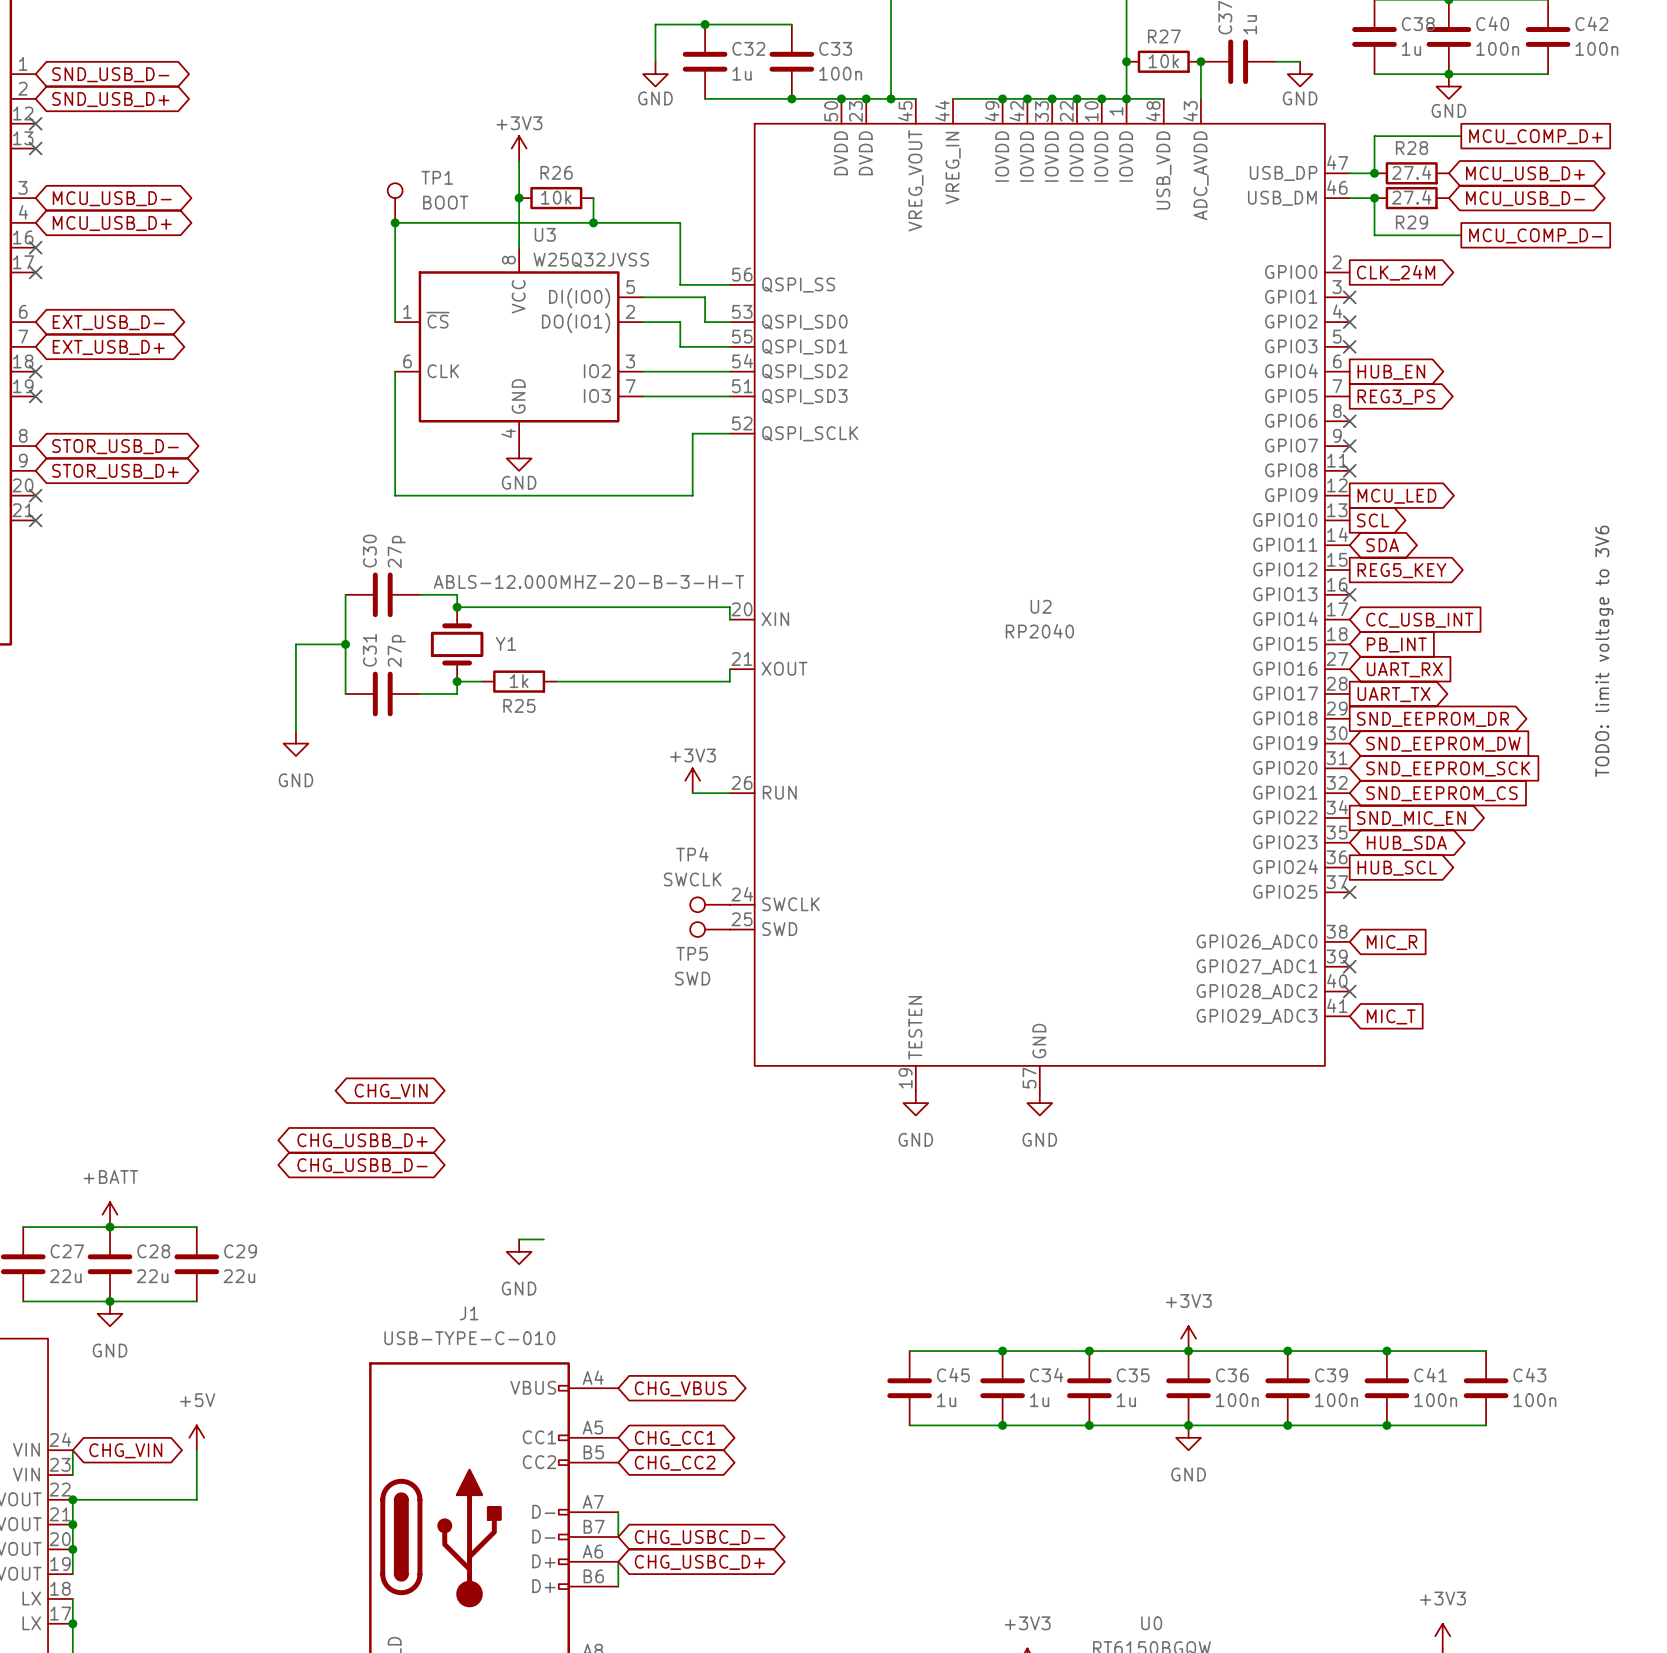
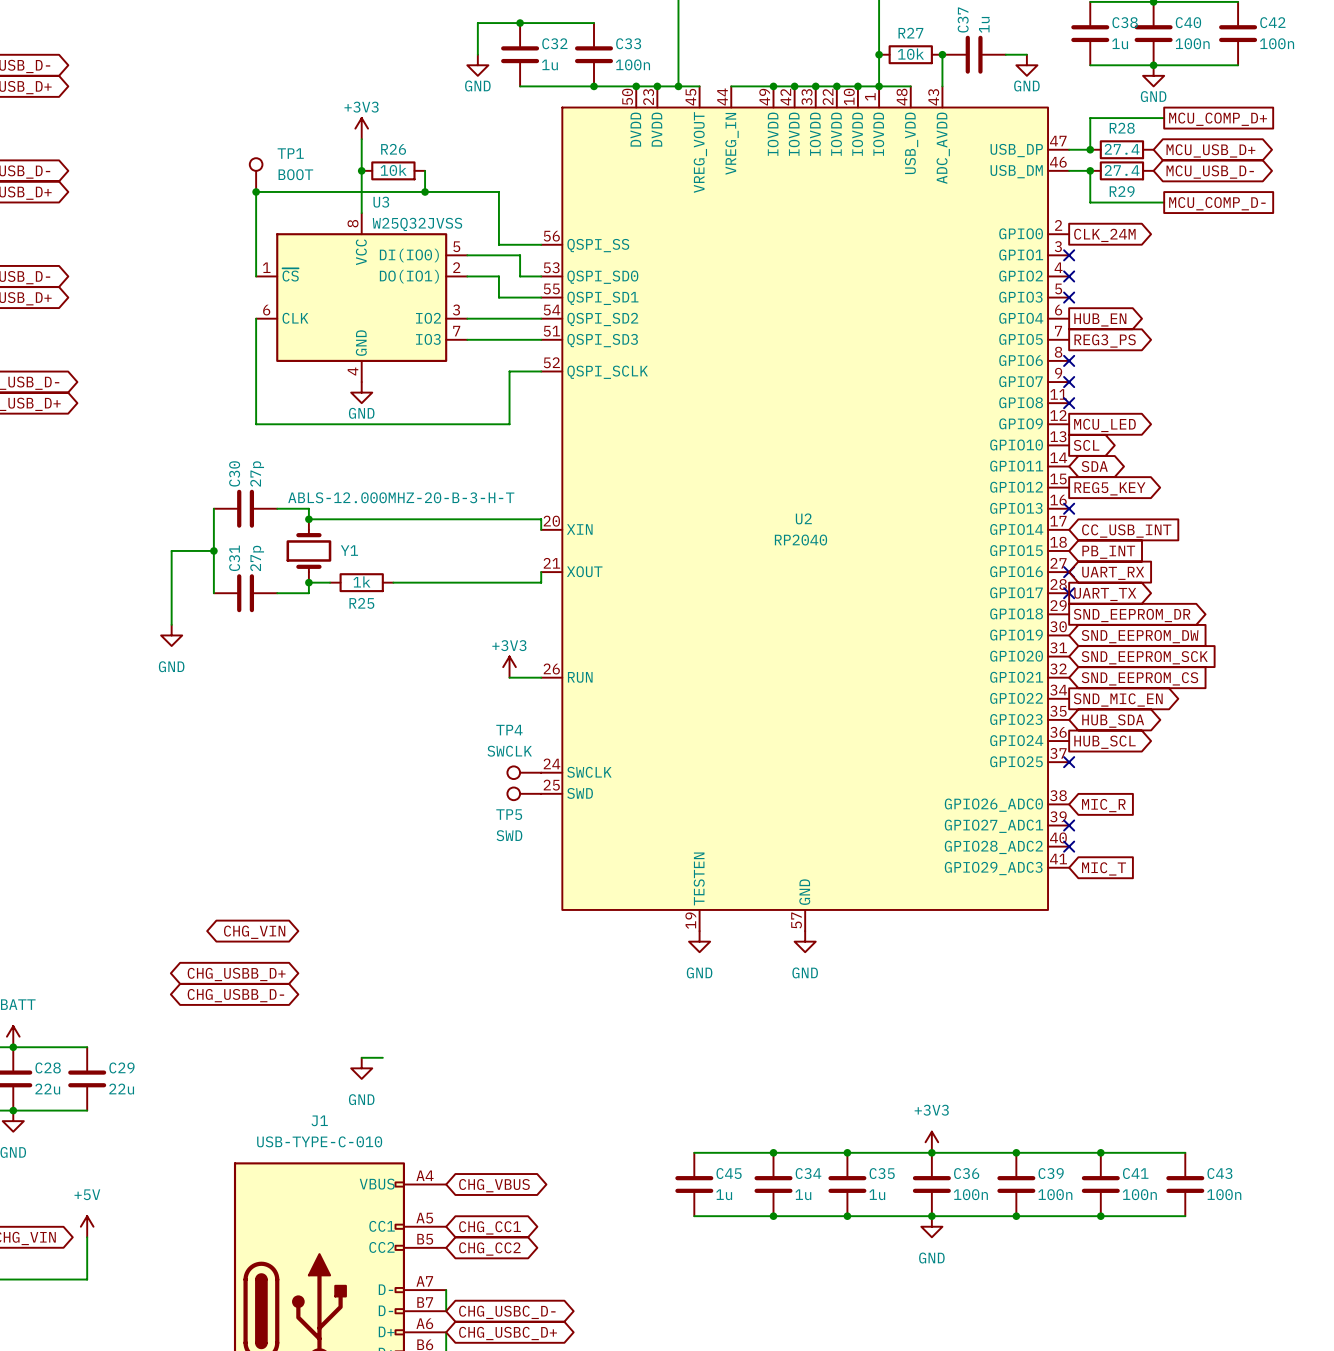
text: TODO: limit voltage to 3V6 (1604, 651) -> none
no-connect mark: none -> (1069, 572)
no-connect mark: none -> (1069, 593)

